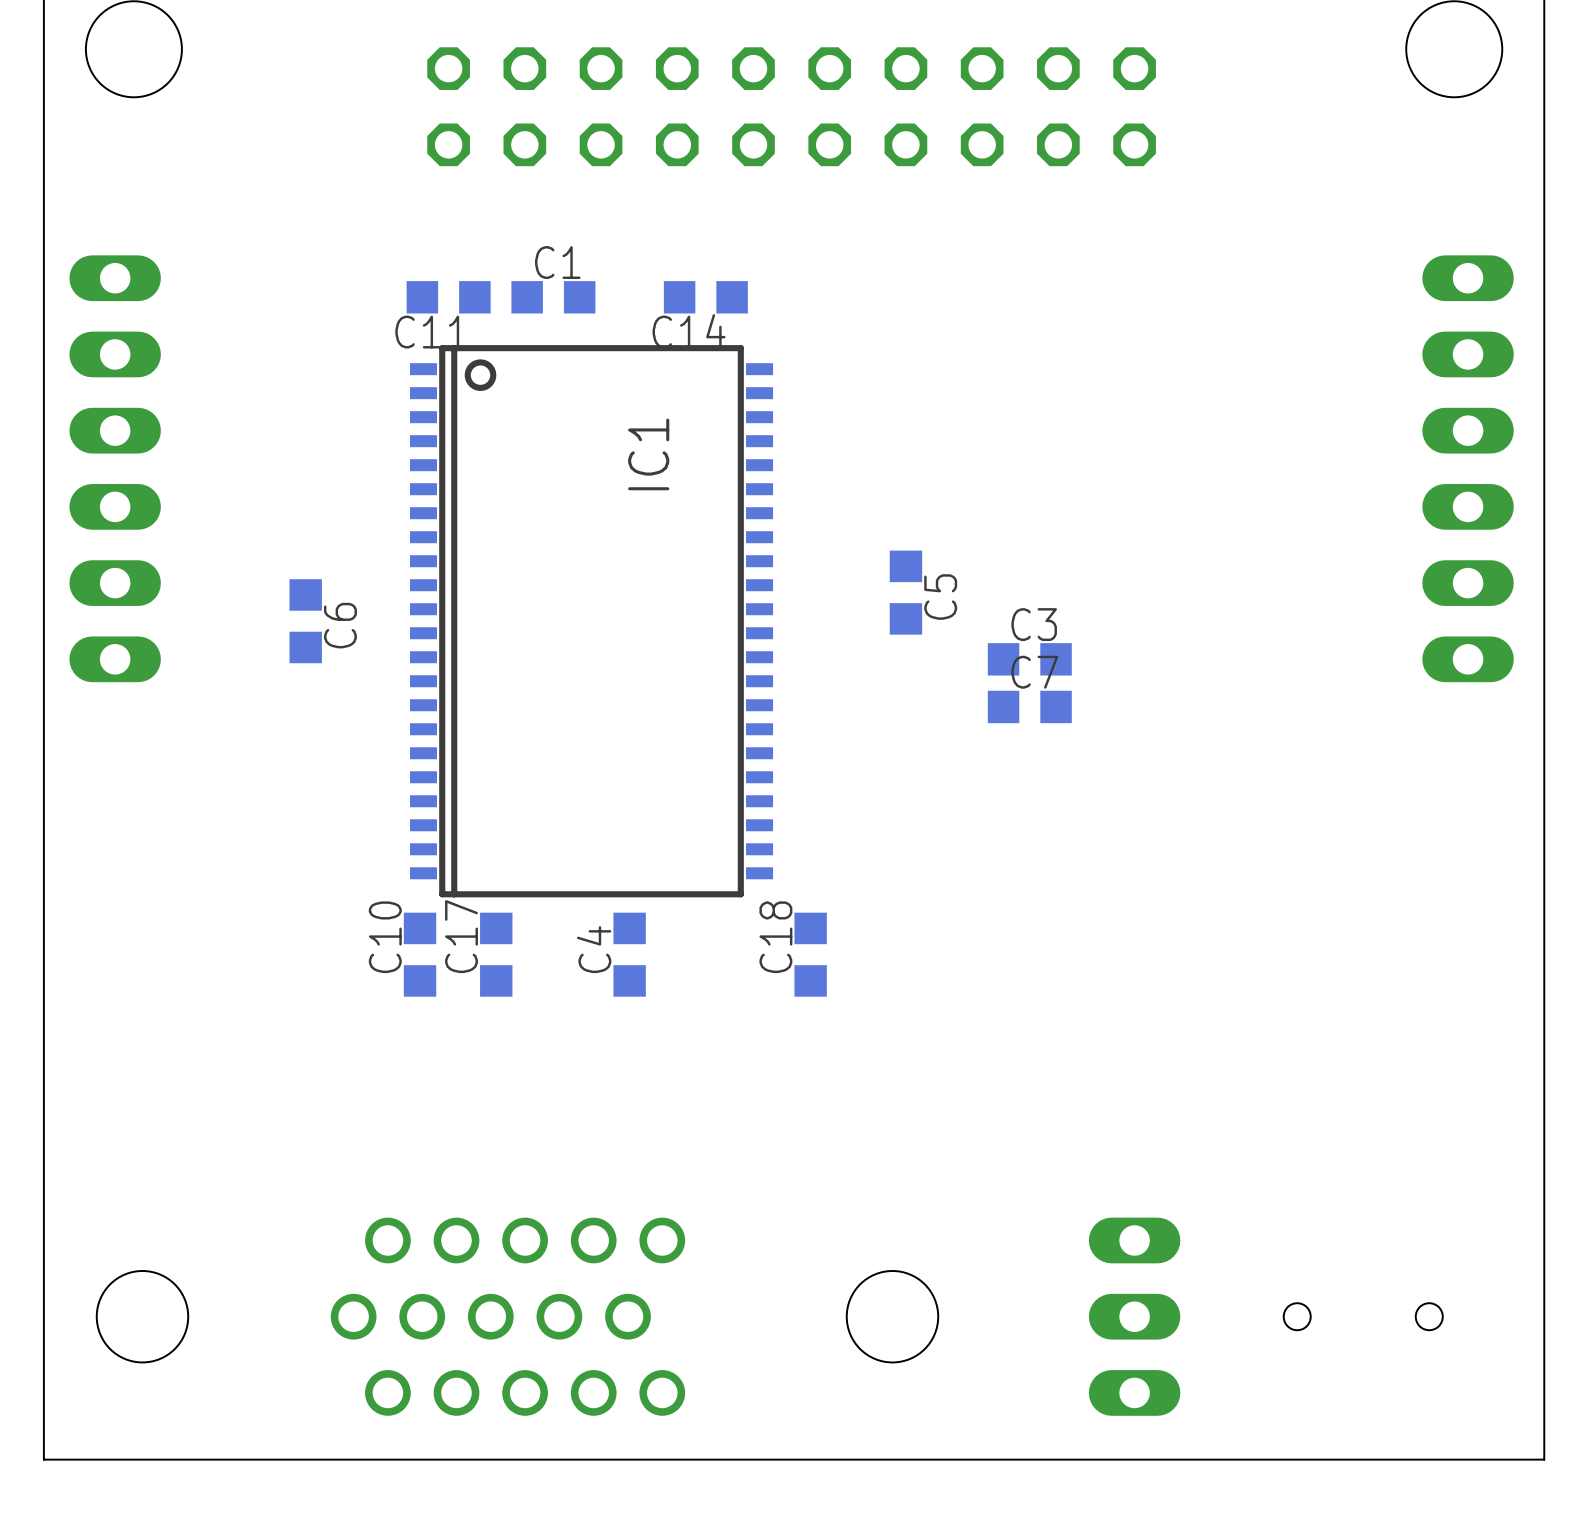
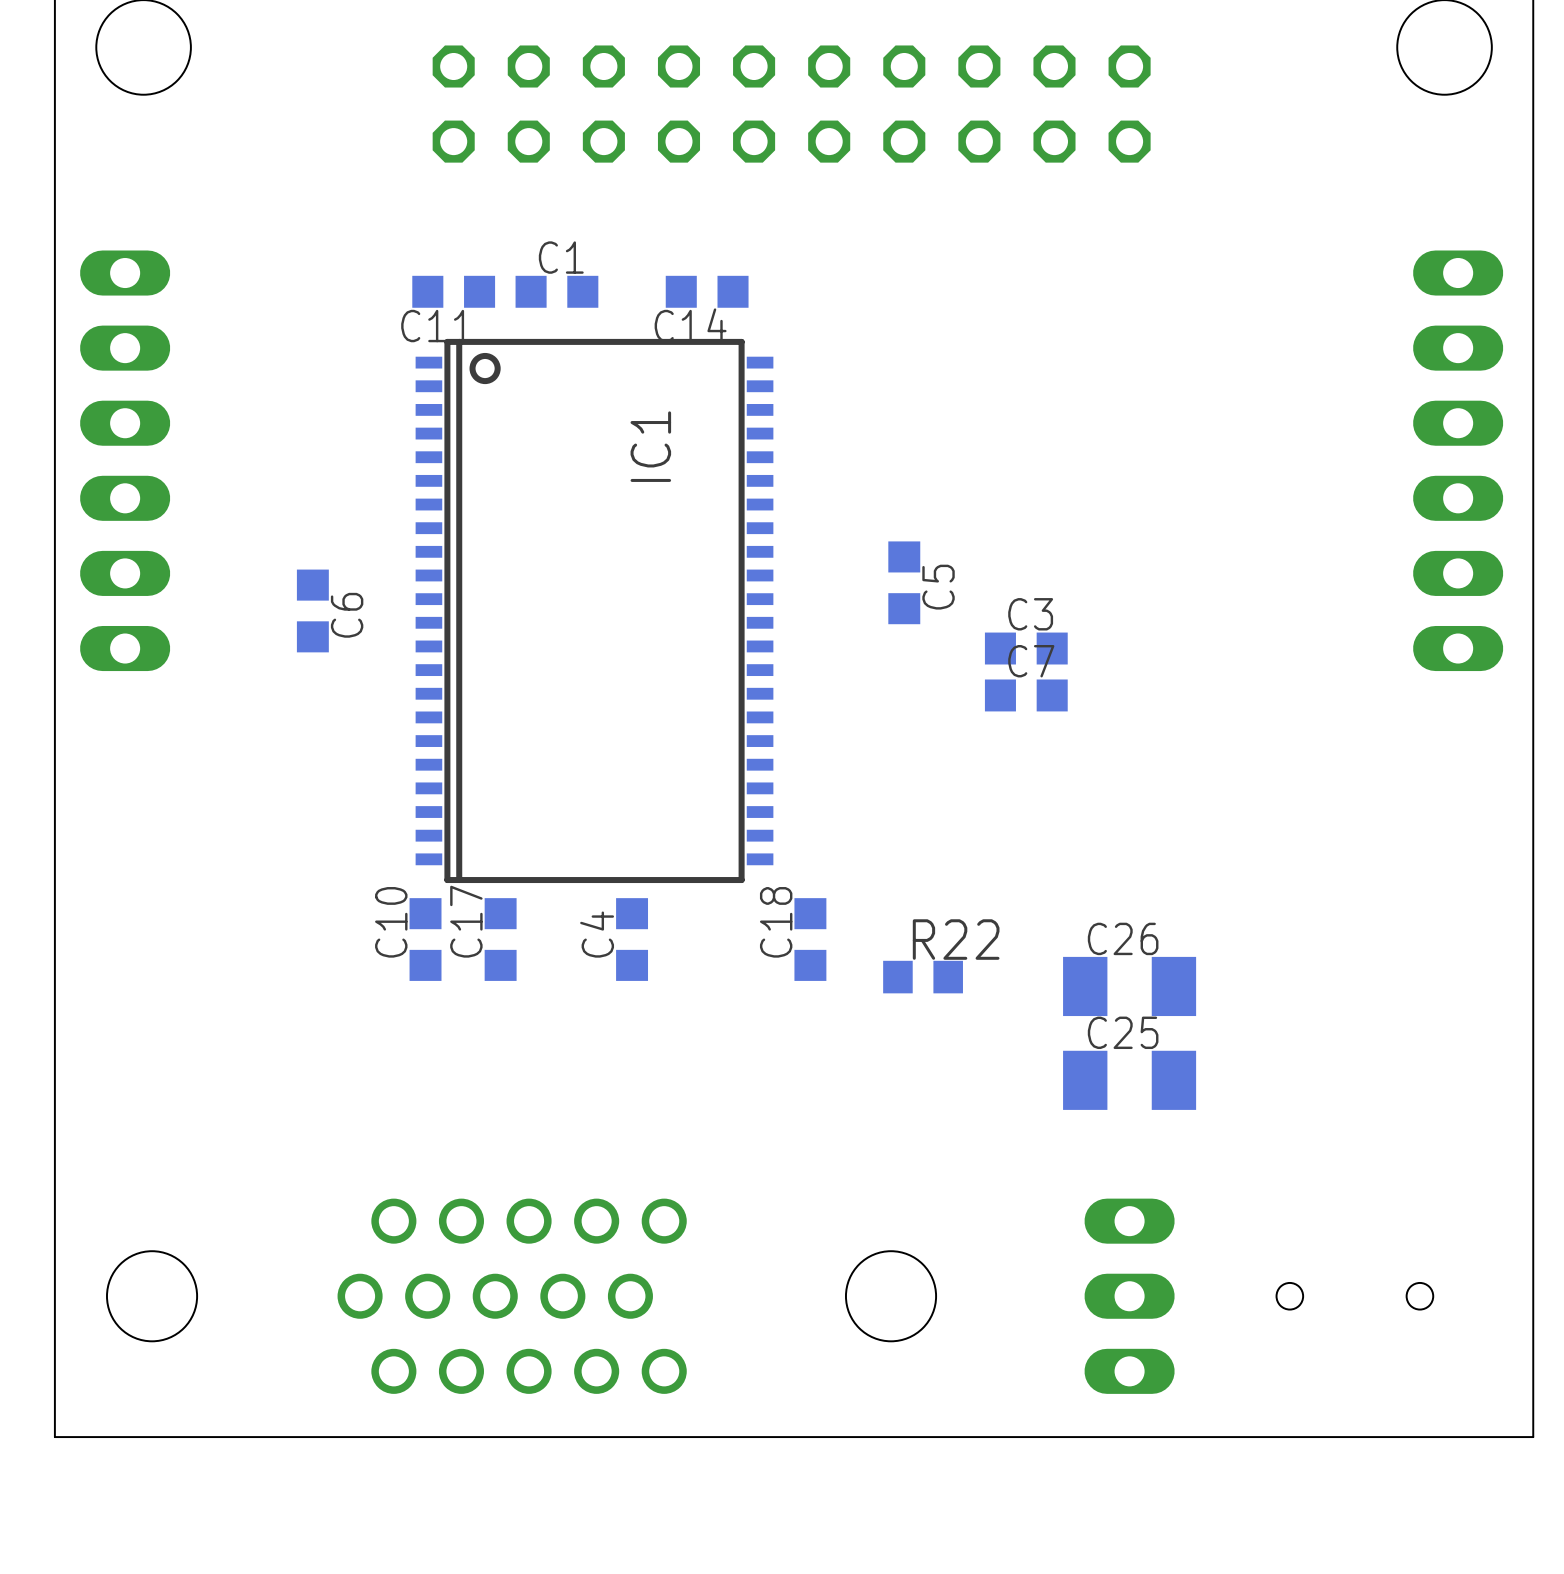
R22: none -> (923, 977)
C26: none -> (1129, 986)
C25: none -> (1129, 1080)

